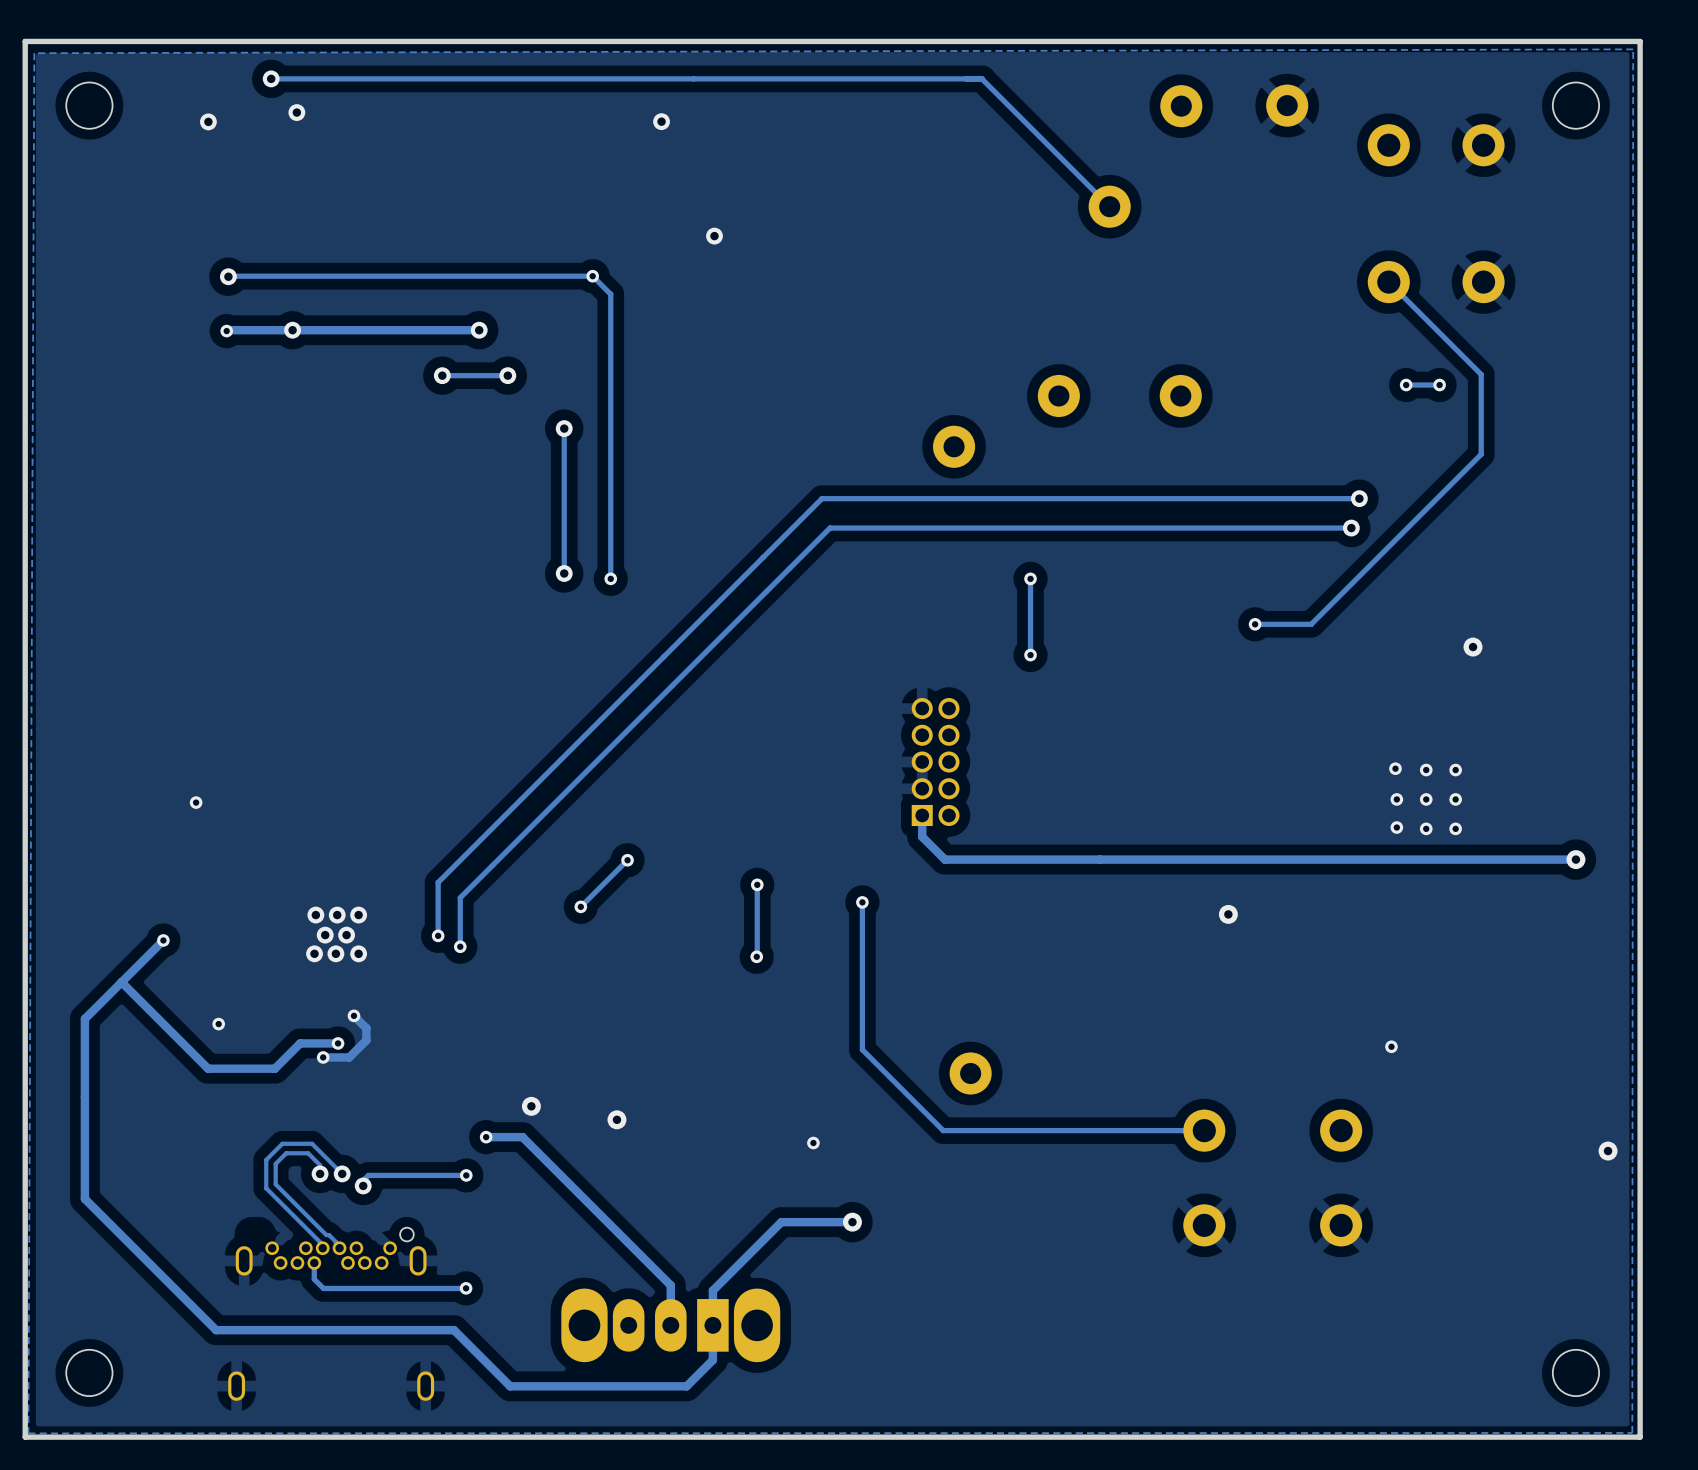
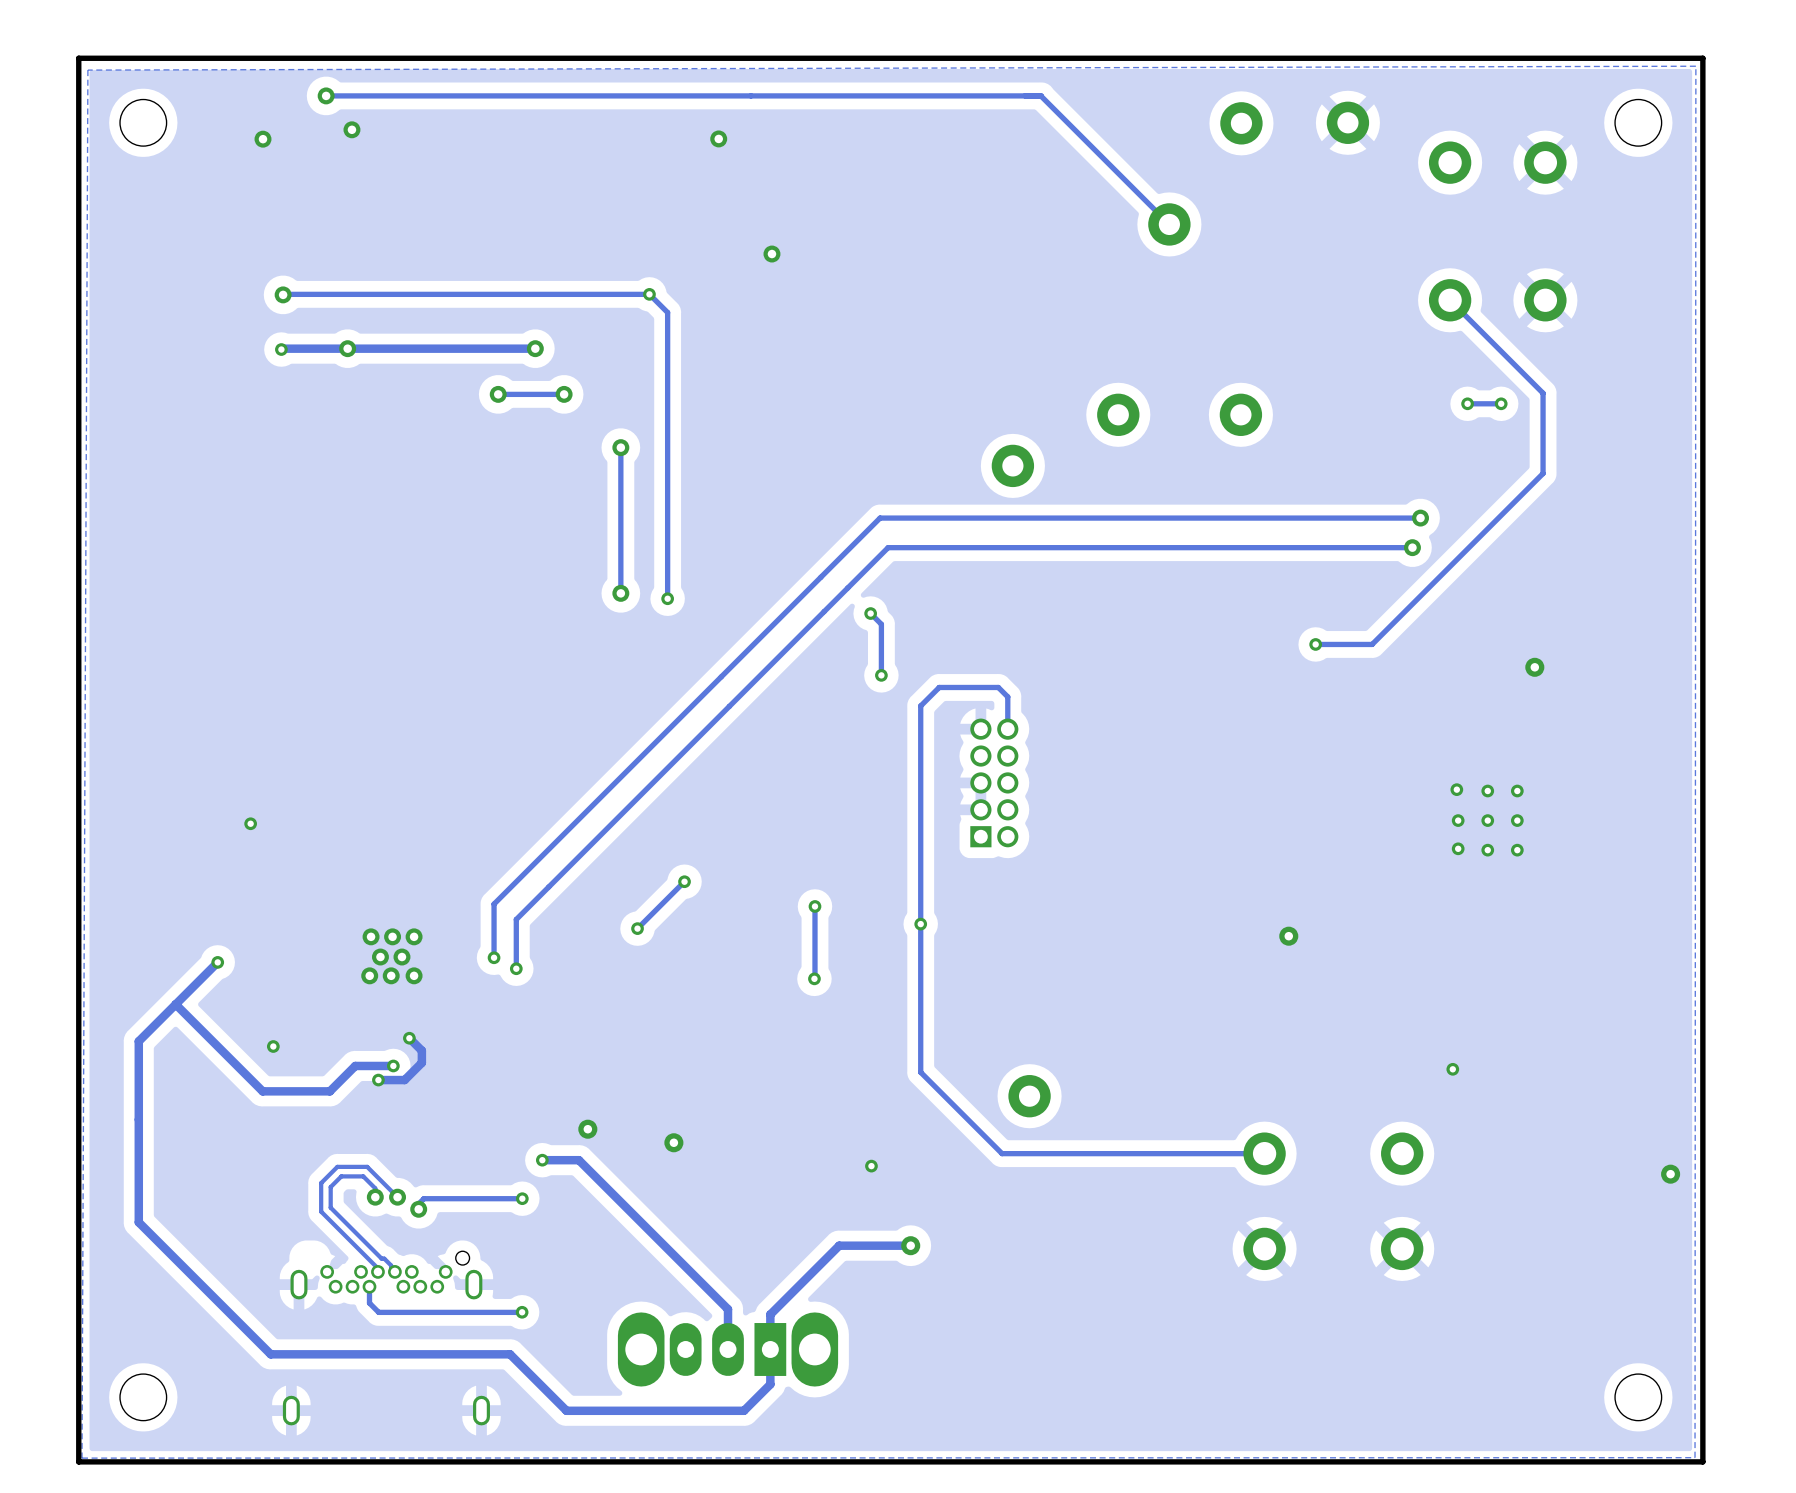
track: (1030, 578) (1030, 655) -> none
via: (1030, 578) -> none
track: none -> (870, 613) (881, 624) (881, 675)
via: none -> (870, 613)
via: none -> (881, 675)
via: (1030, 655) -> none
track: none -> (1007, 729) (1007, 696) (998, 687) (939, 687) (920, 705) (920, 924)
track: (922, 815) (922, 836) (944, 859) (1575, 859) -> none
via: (1575, 859) -> none

